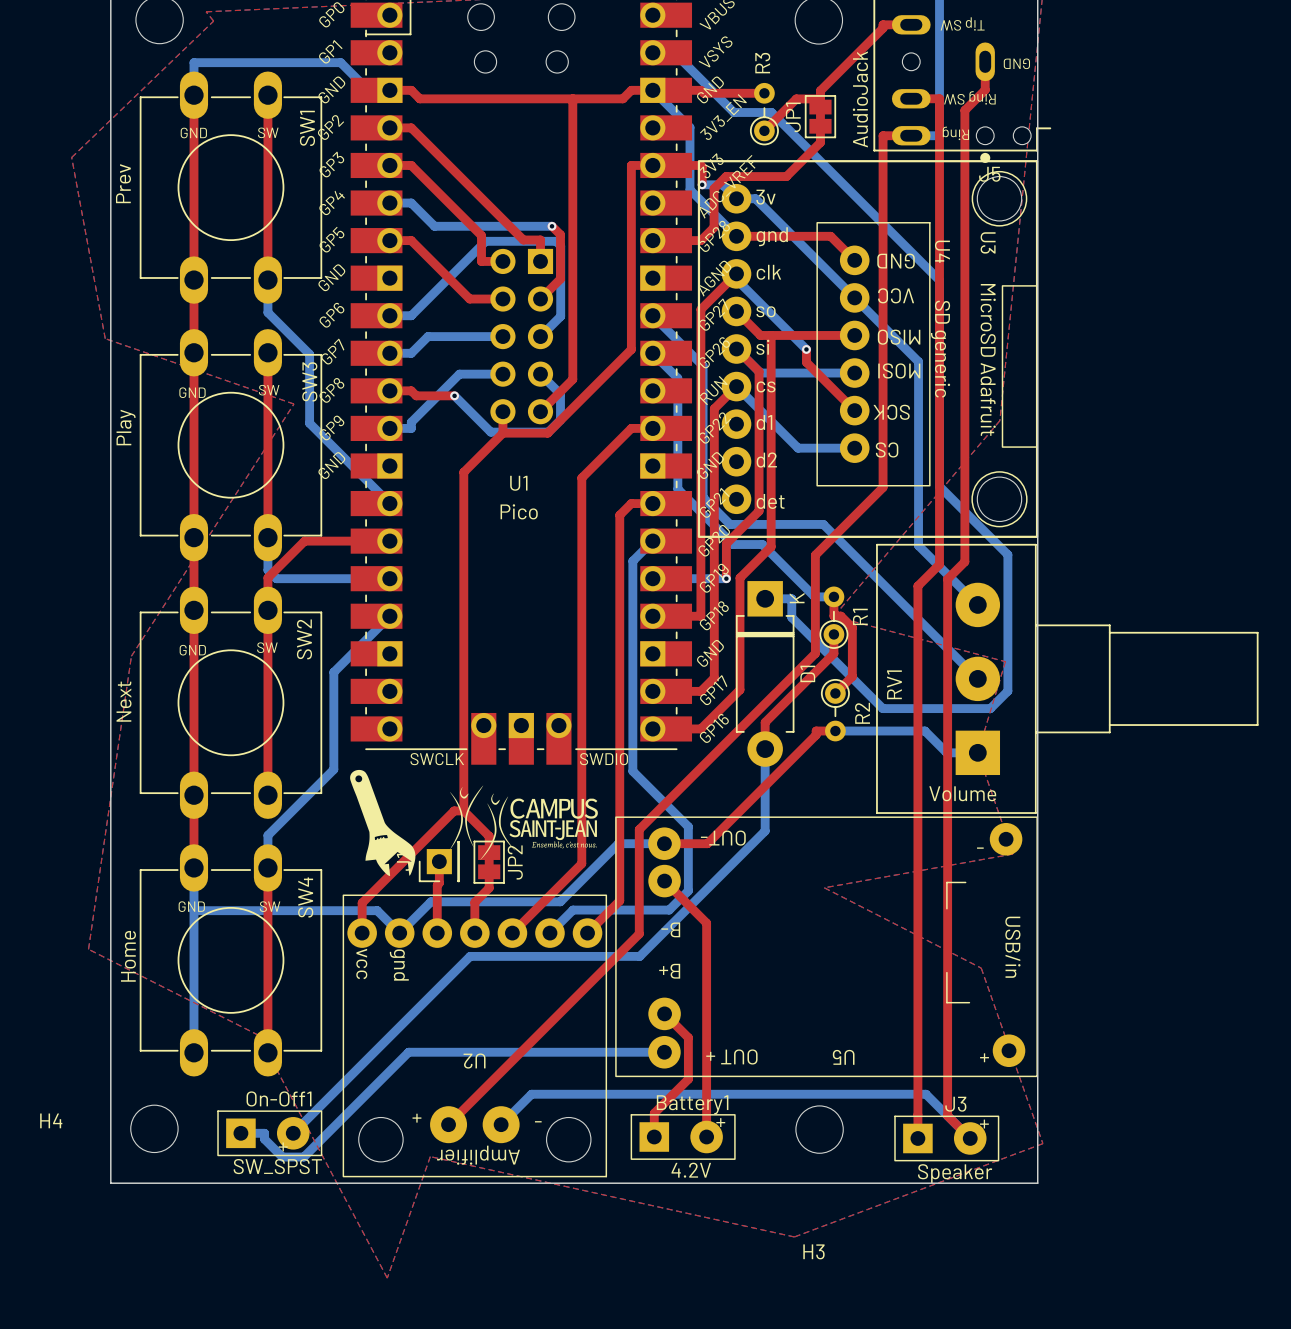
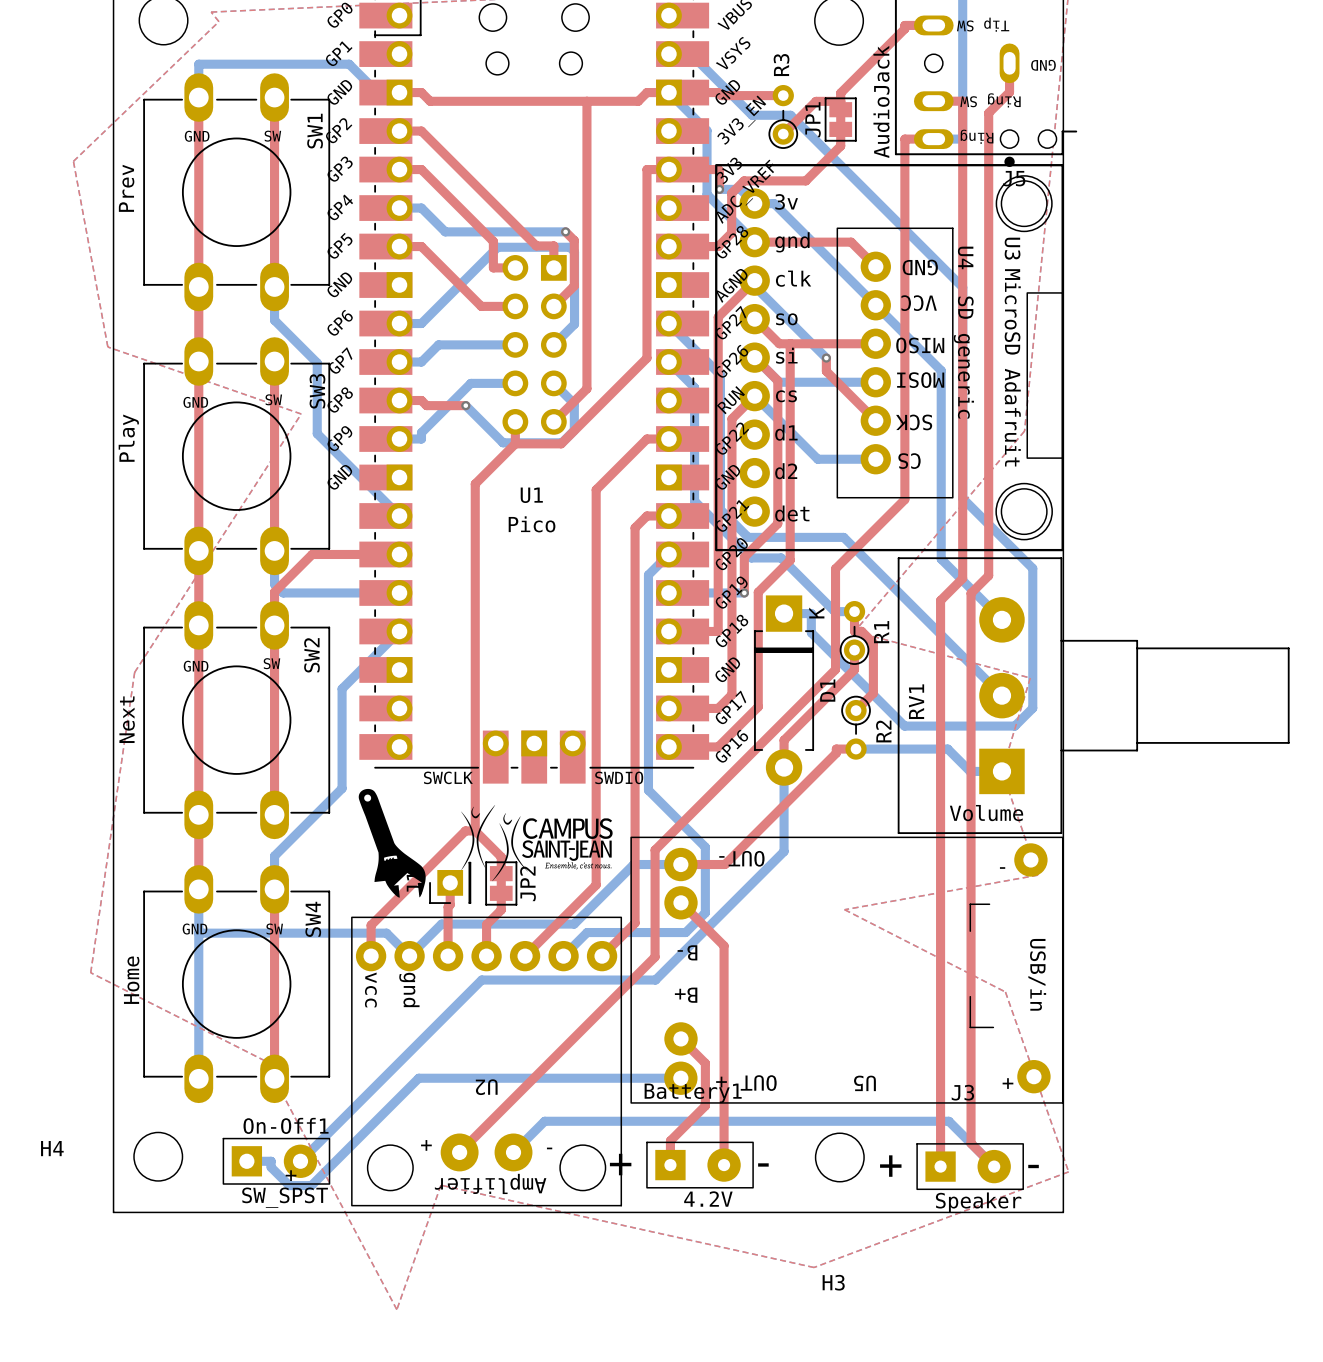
Battery1 name position: Battery1 (692, 1104) -> Battery1 (693, 1093)
J3 name position: J3 (955, 1104) -> J3 (962, 1092)
Battery1 footprint: [630, 1114, 736, 1160] -> [646, 1141, 754, 1189]
J3 footprint: [894, 1115, 1000, 1162] -> [916, 1143, 1024, 1191]

